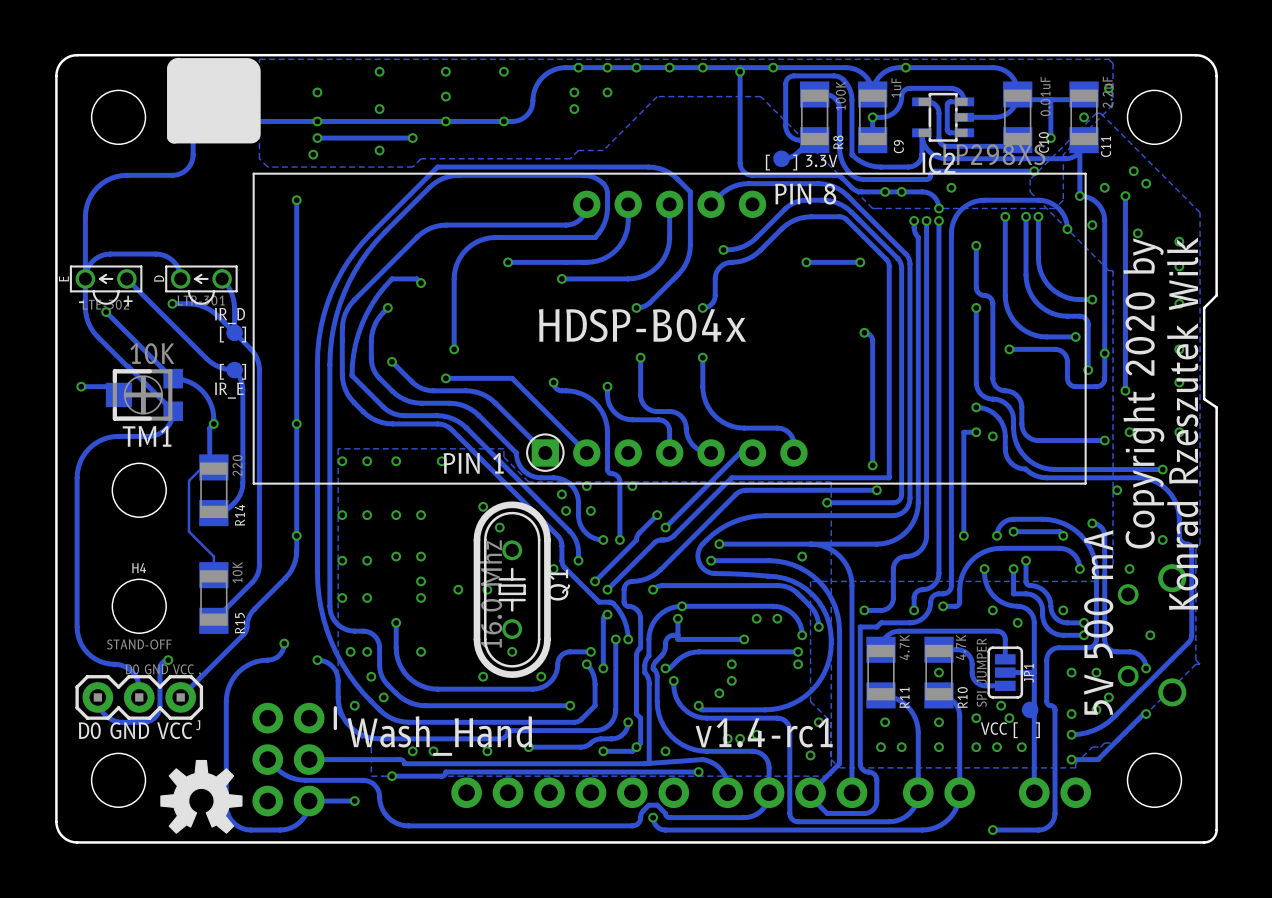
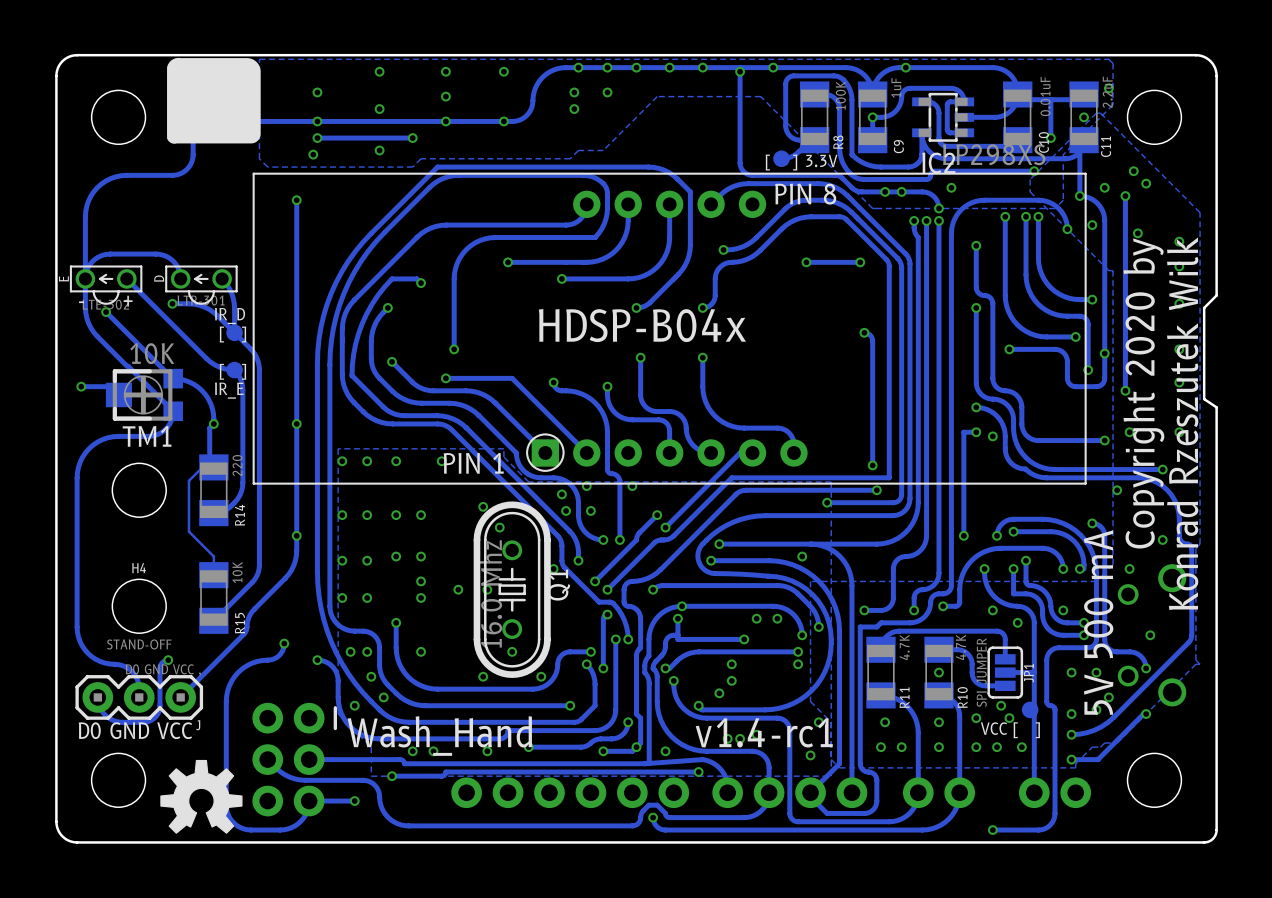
track: (1050, 531) (1060, 531) (1063, 535) -> (1050, 531) (1063, 534) (1074, 541) (1081, 552) (1084, 568)
via position: (1063, 535) -> (1063, 568)
track: (1042, 548) (1061, 548) (1069, 551) (1077, 558) (1079, 568) -> (1042, 548) (1050, 549) (1057, 554) (1061, 561) (1063, 568)

